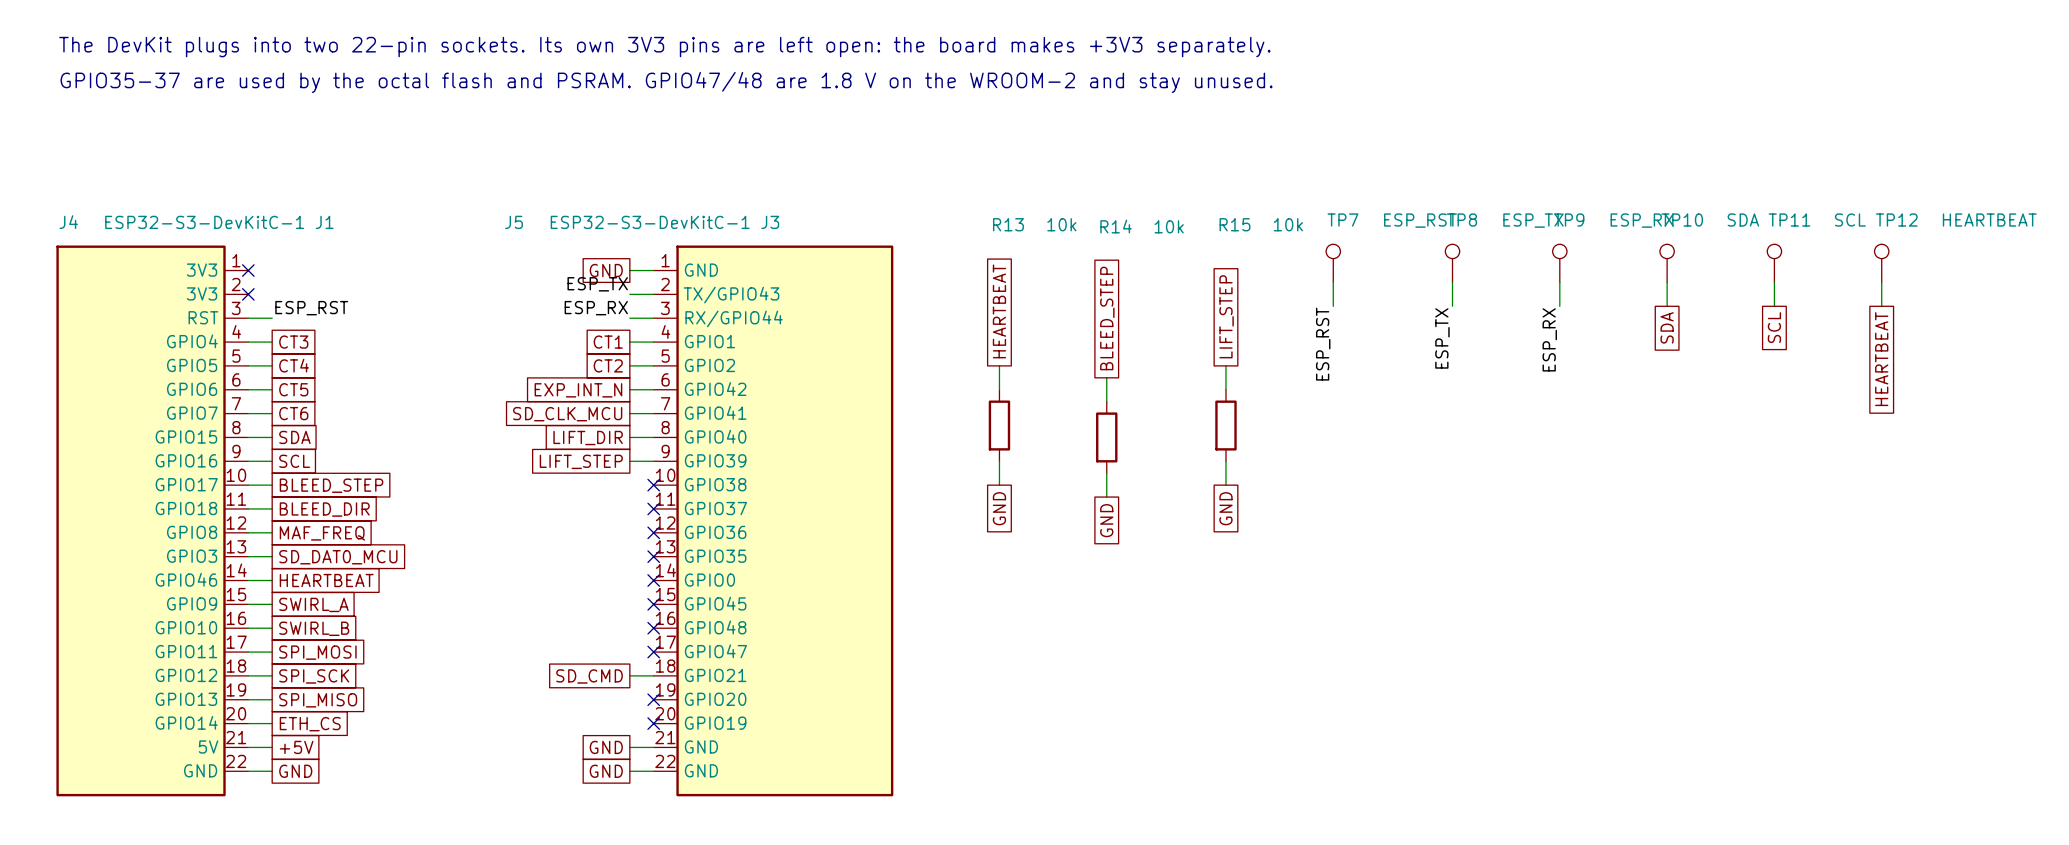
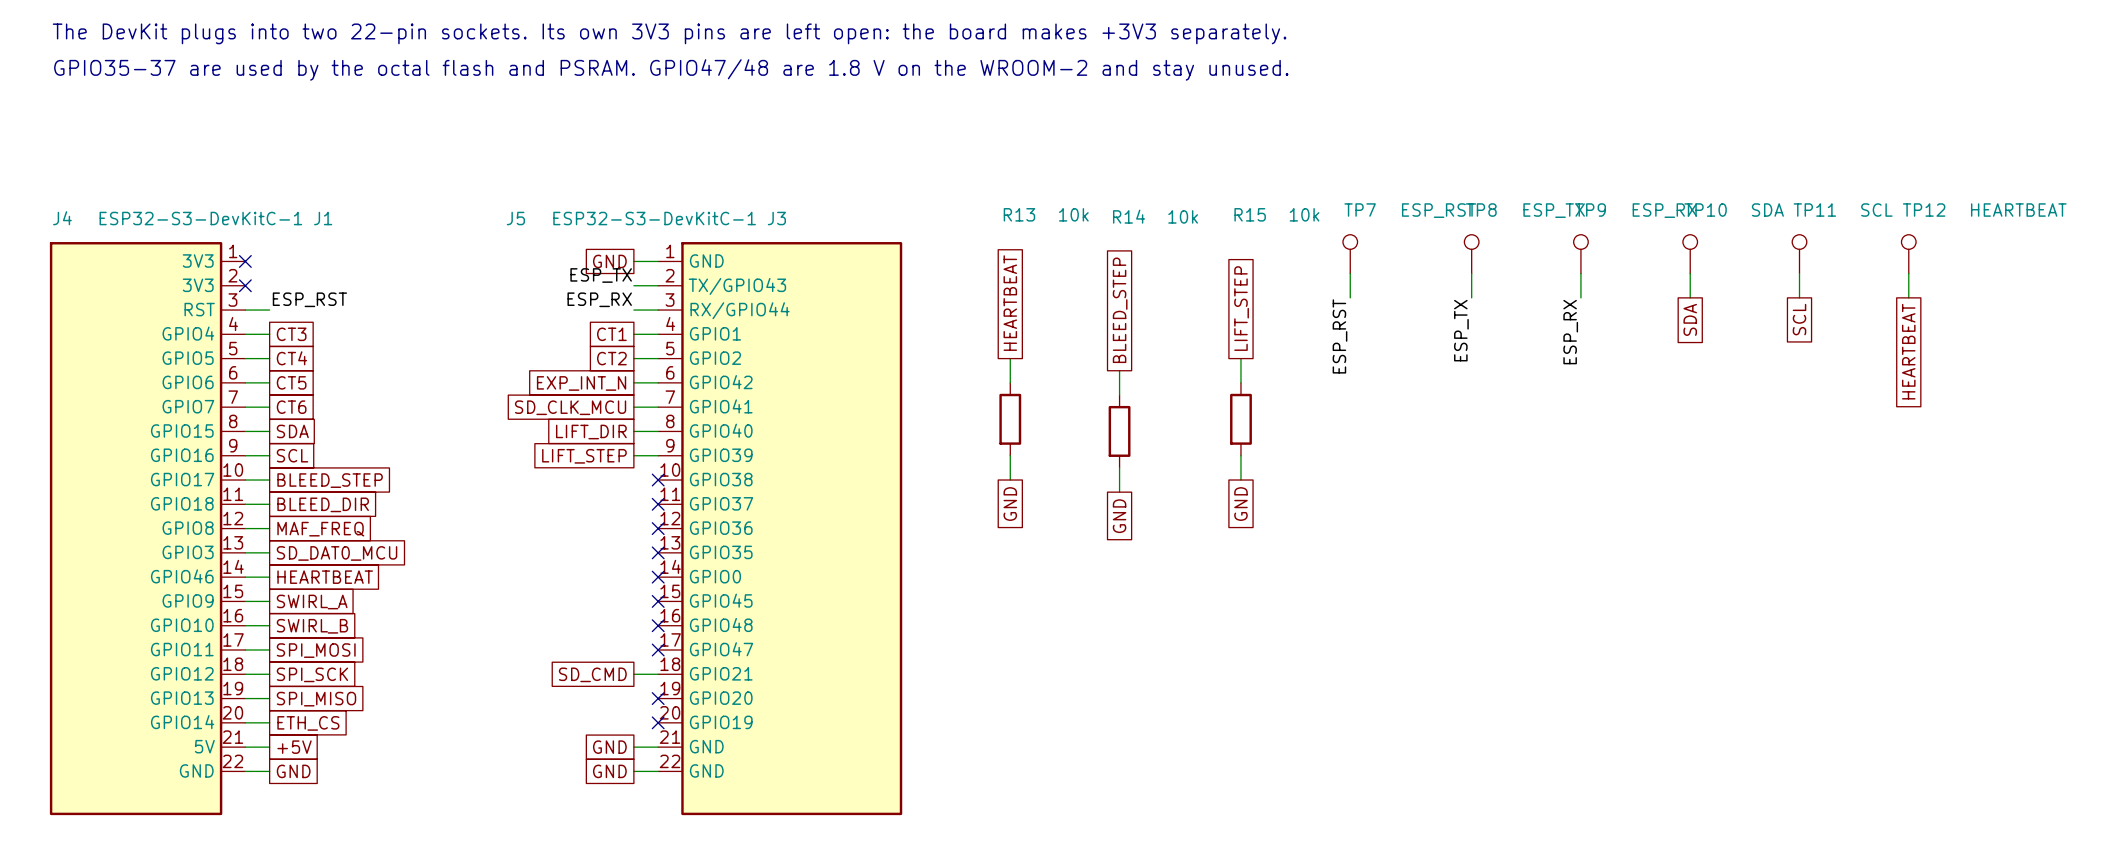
J4 symbol: [56, 245, 249, 797] -> [49, 242, 246, 816]
J5 symbol: [653, 245, 894, 797] -> [658, 242, 903, 816]

